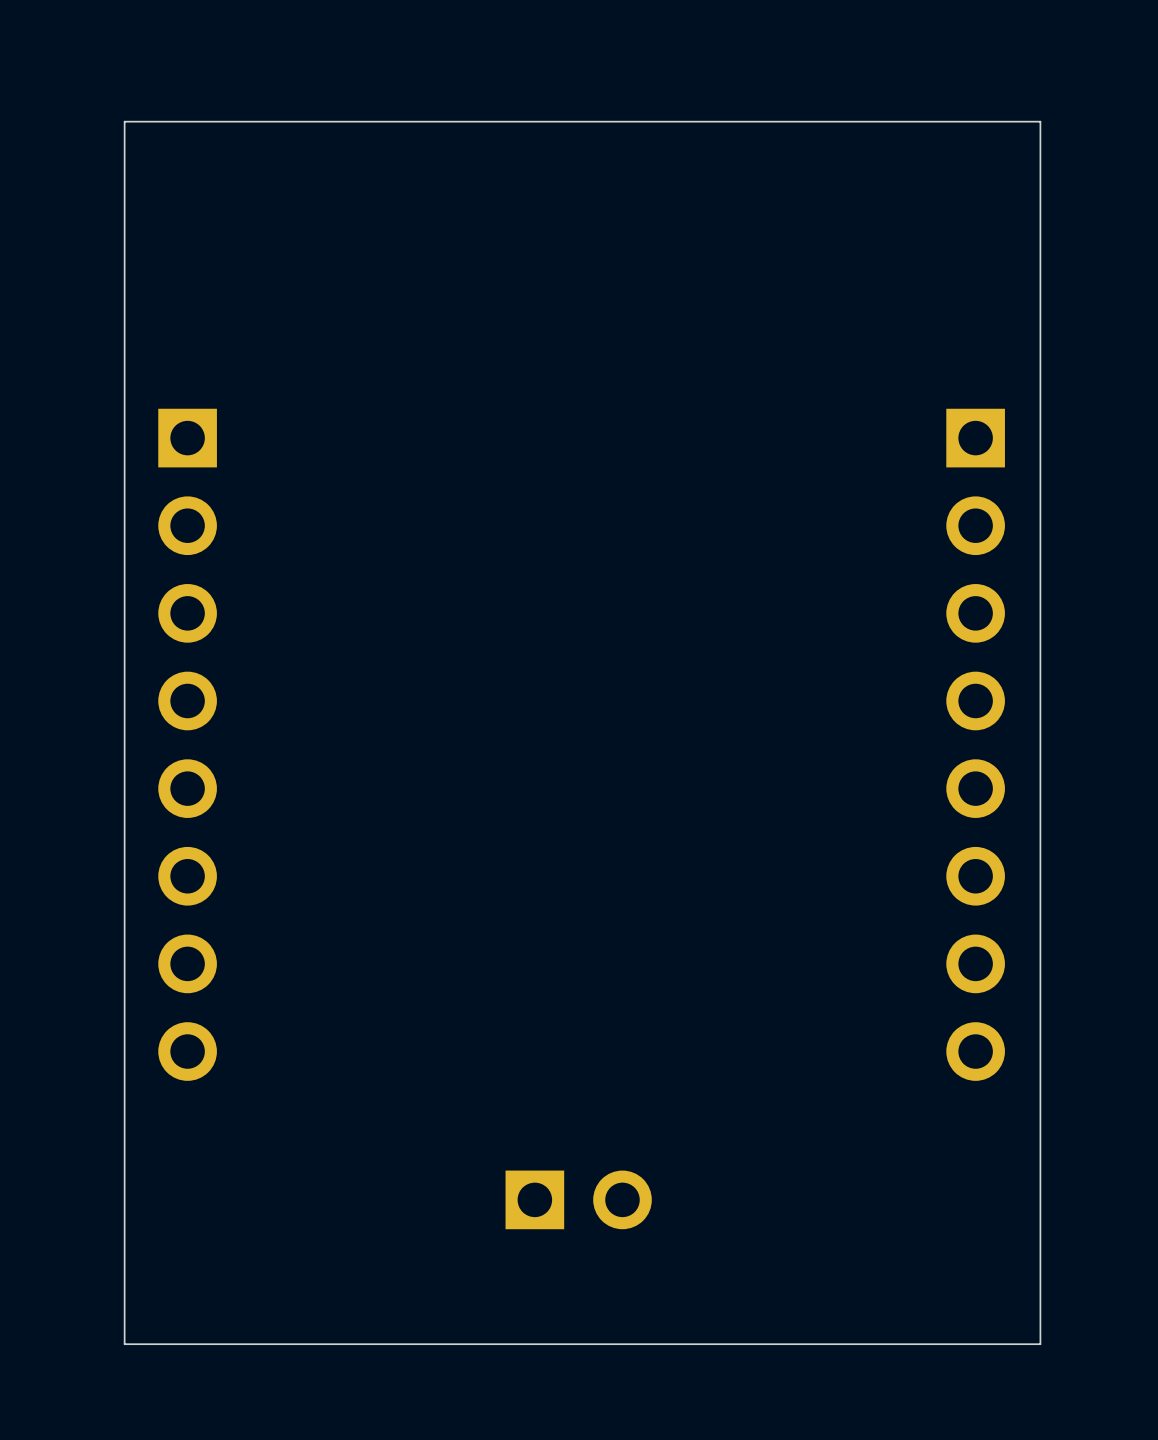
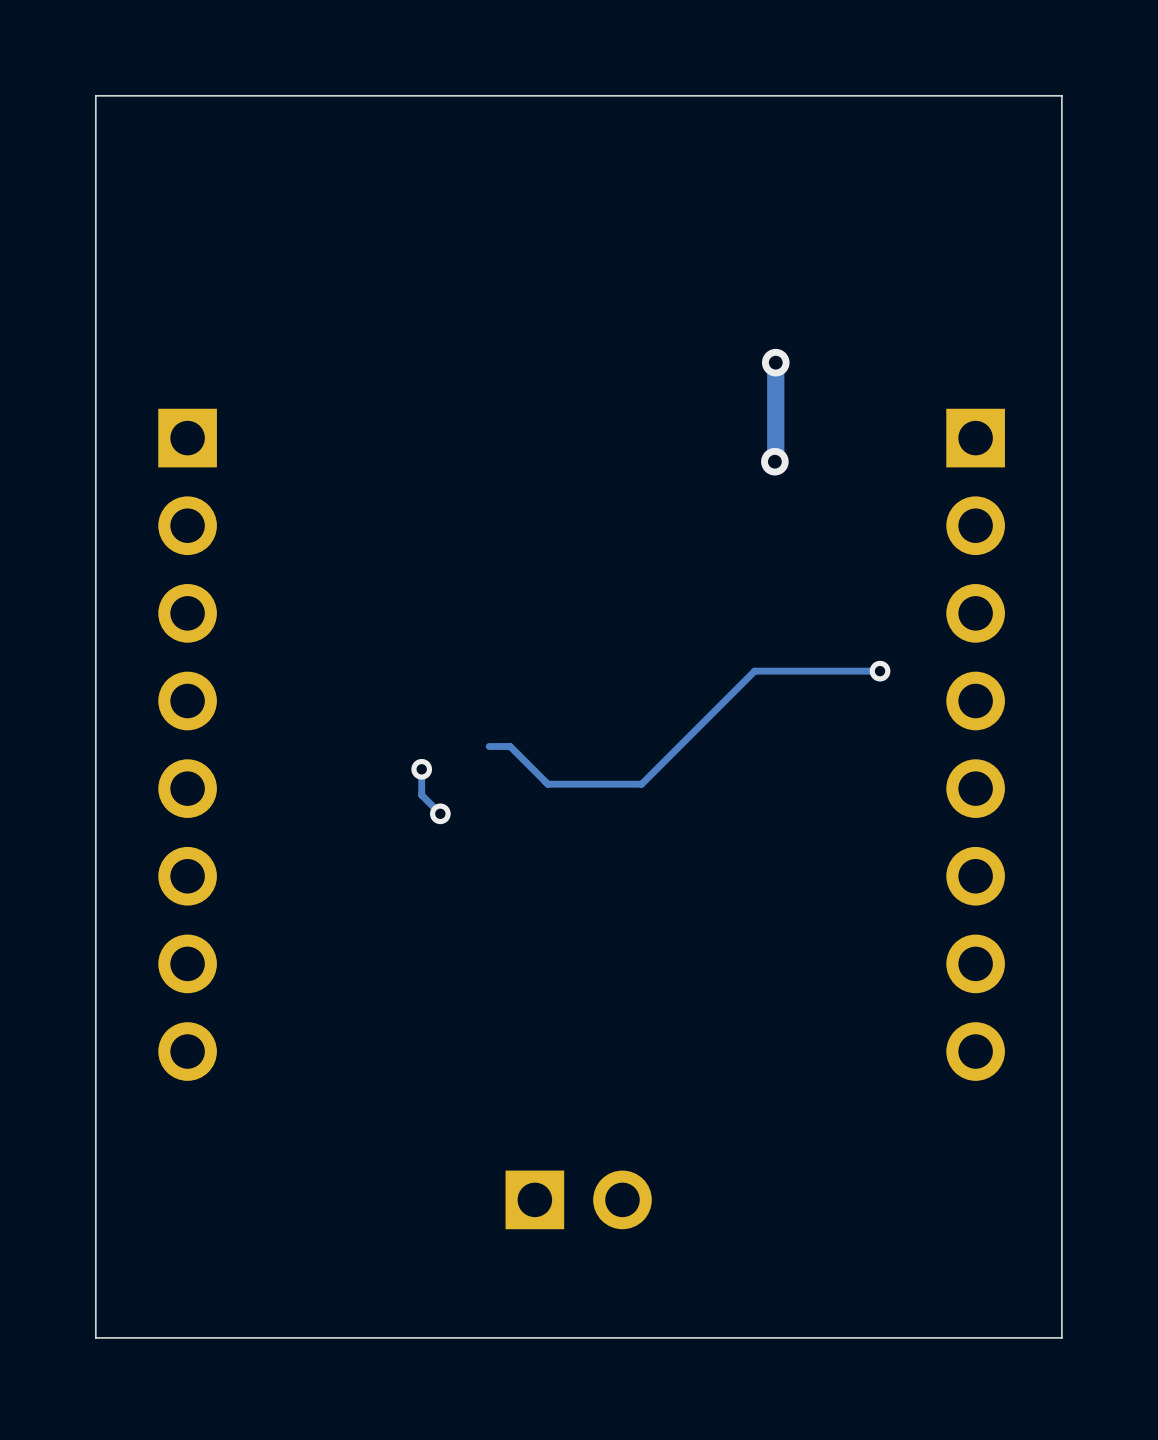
board edge: (1040, 121) (124, 121) (124, 1344) (1040, 1344) (1040, 121) -> (1061, 95) (1061, 1337) (95, 1337) (95, 95) (1061, 95)
track: none -> (775, 362) (774, 461)
via: none -> (775, 362)
via: none -> (774, 461)
track: none -> (880, 671) (754, 671) (641, 784) (547, 784) (510, 746) (489, 746)
via: none -> (880, 671)
track: none -> (421, 769) (421, 795) (440, 813)
via: none -> (421, 769)
via: none -> (440, 813)

